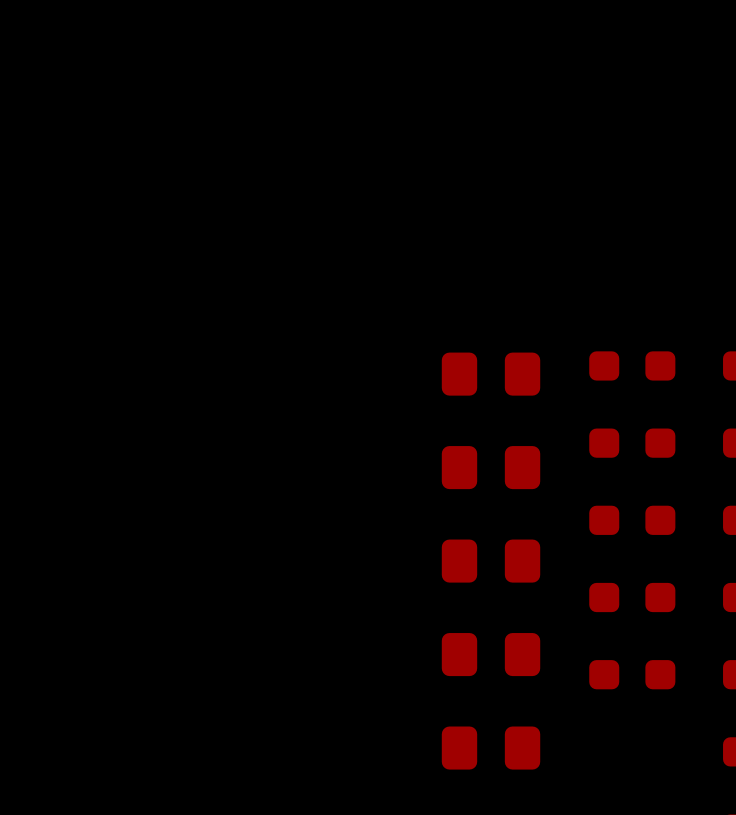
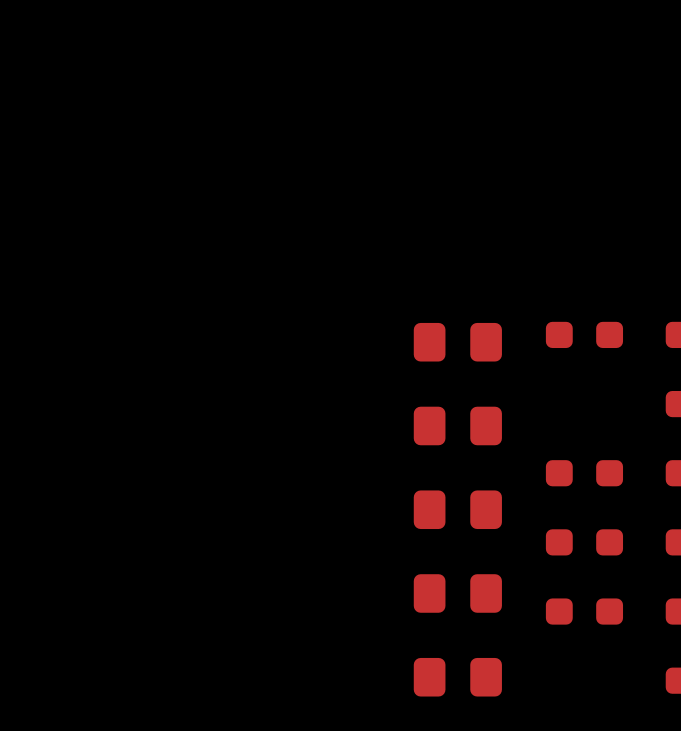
part: (632, 443) -> none

